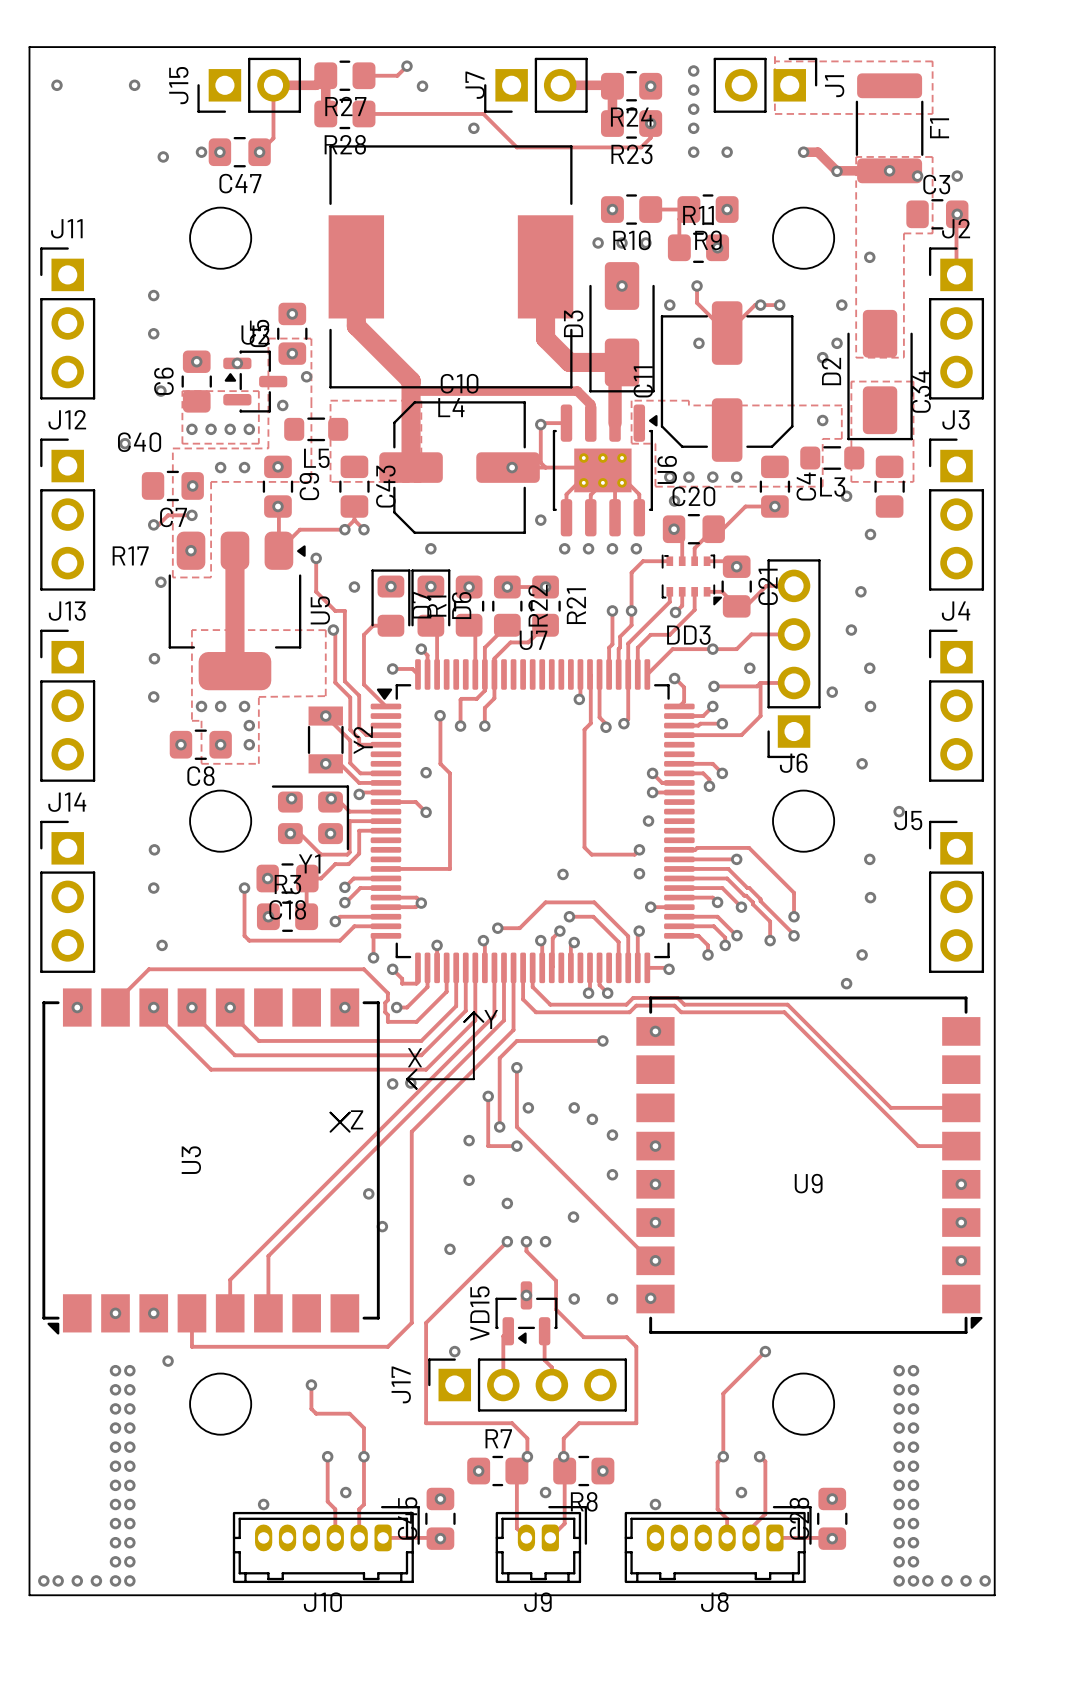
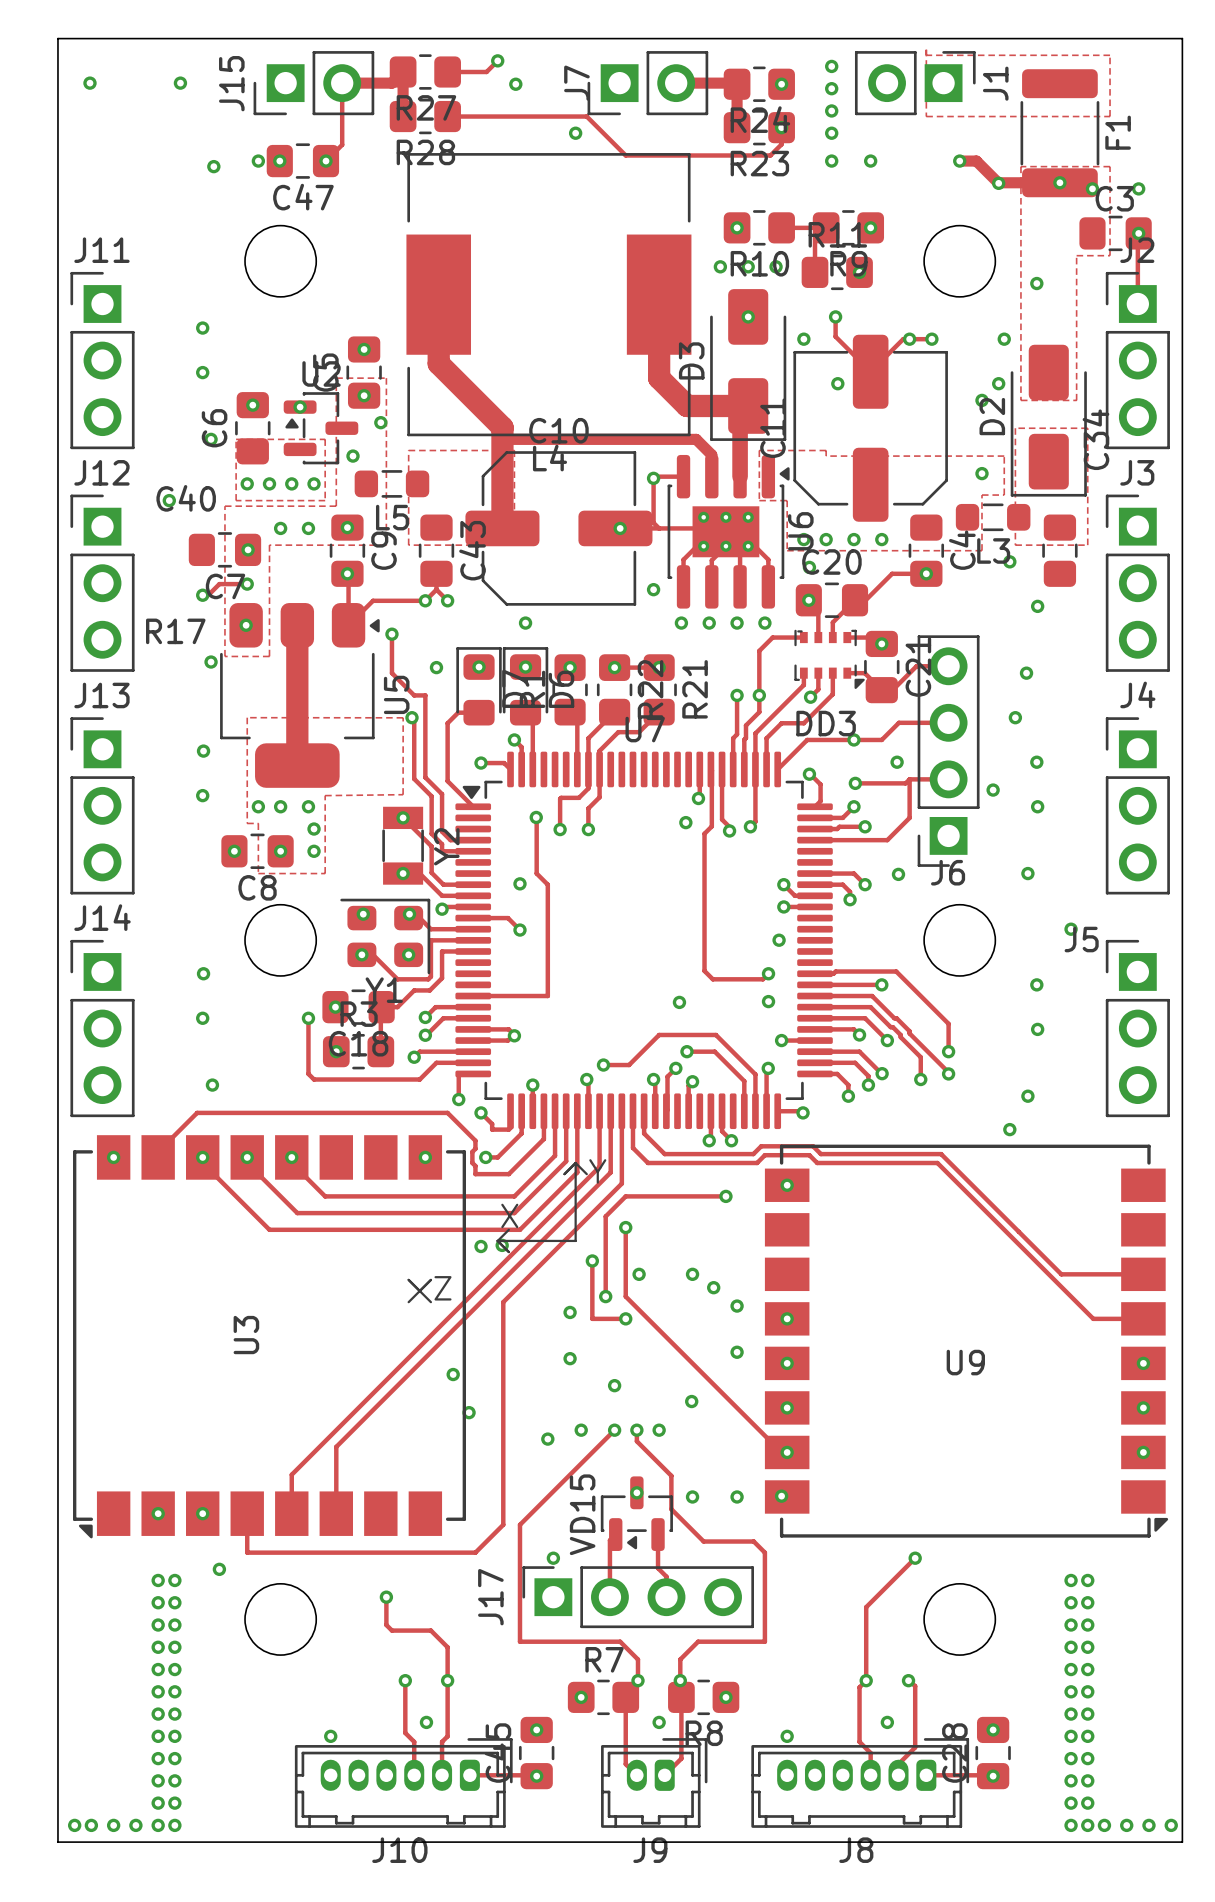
via: none -> (685, 822)
via: none -> (898, 874)
via: none -> (581, 1430)

